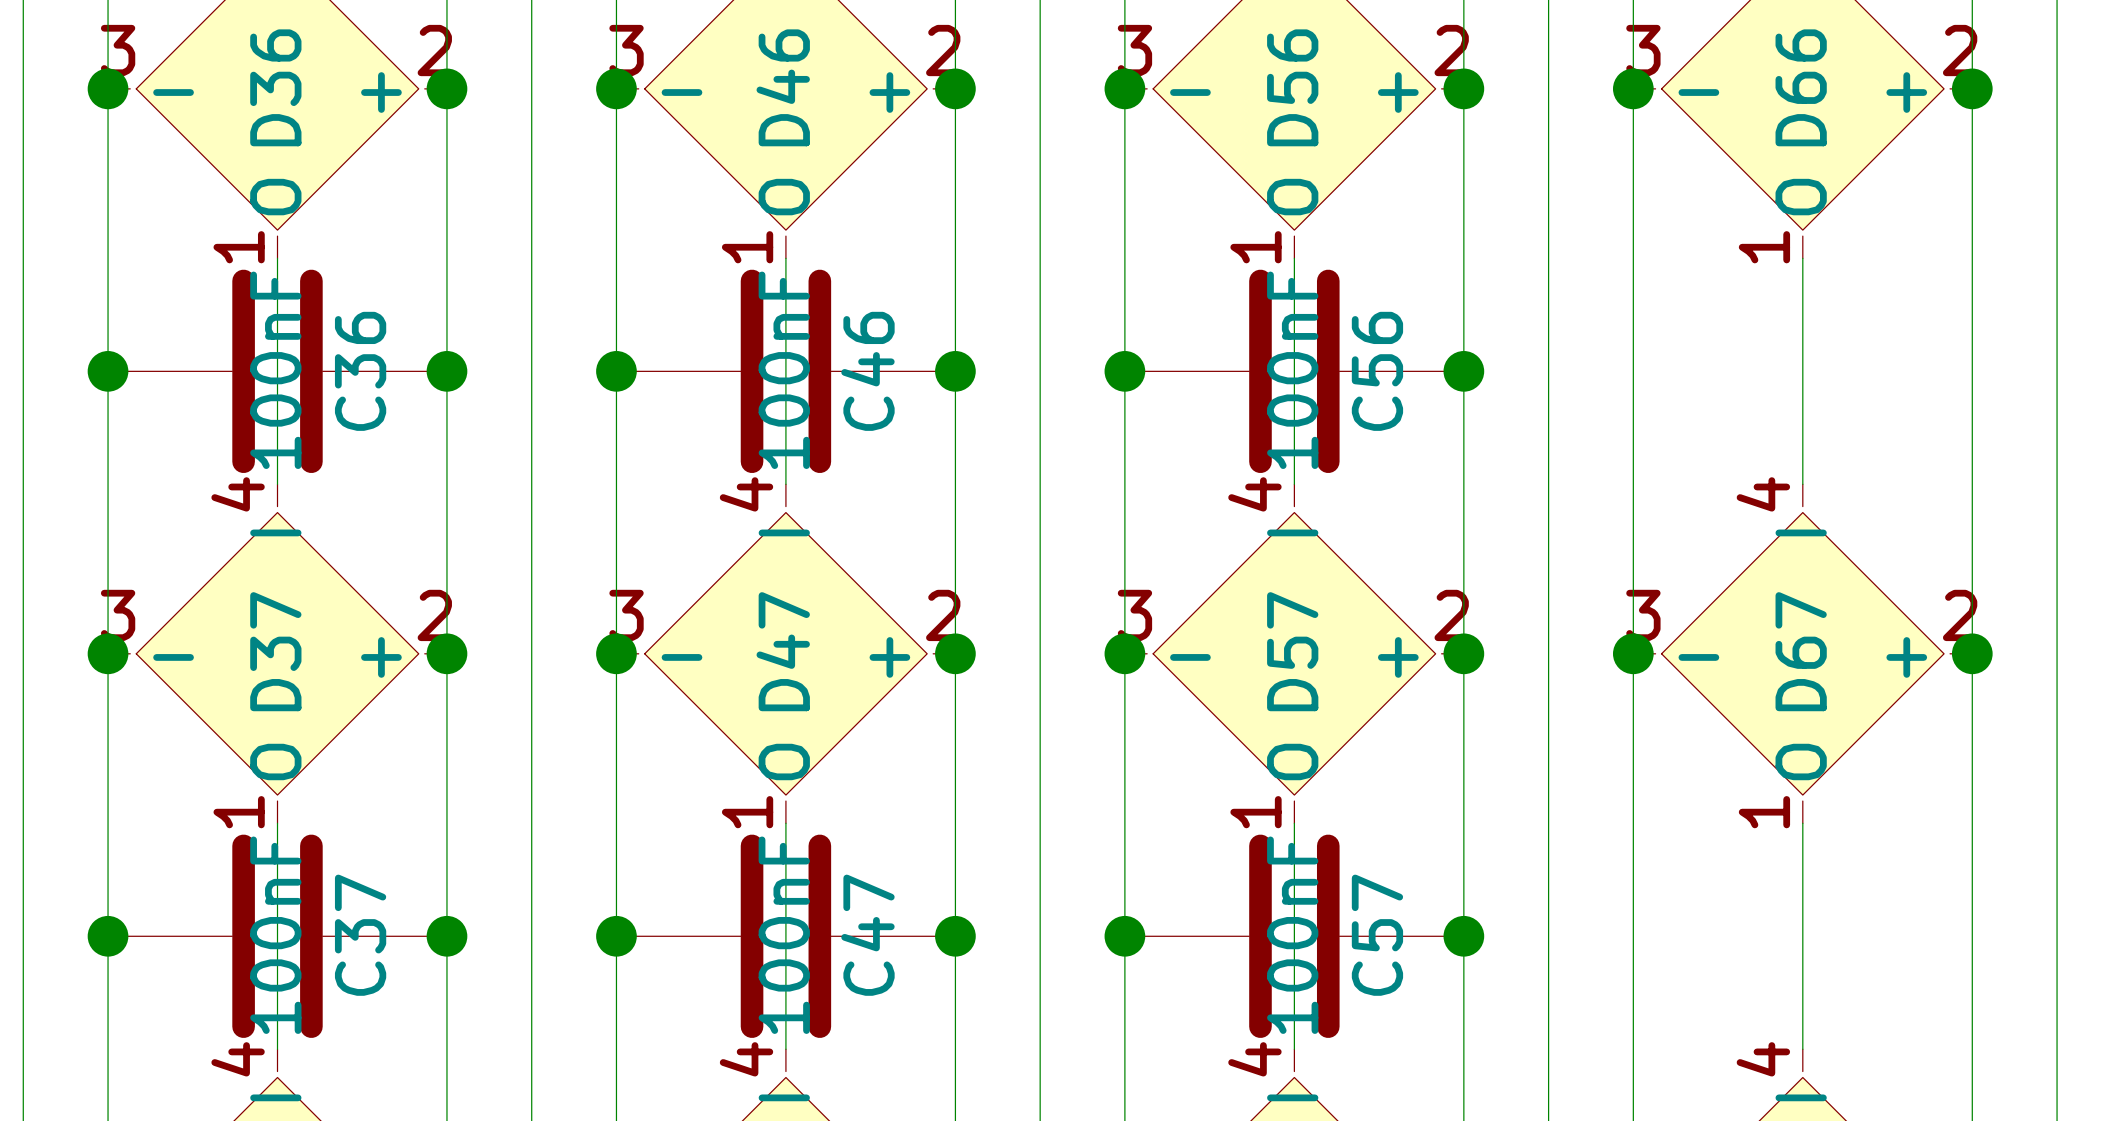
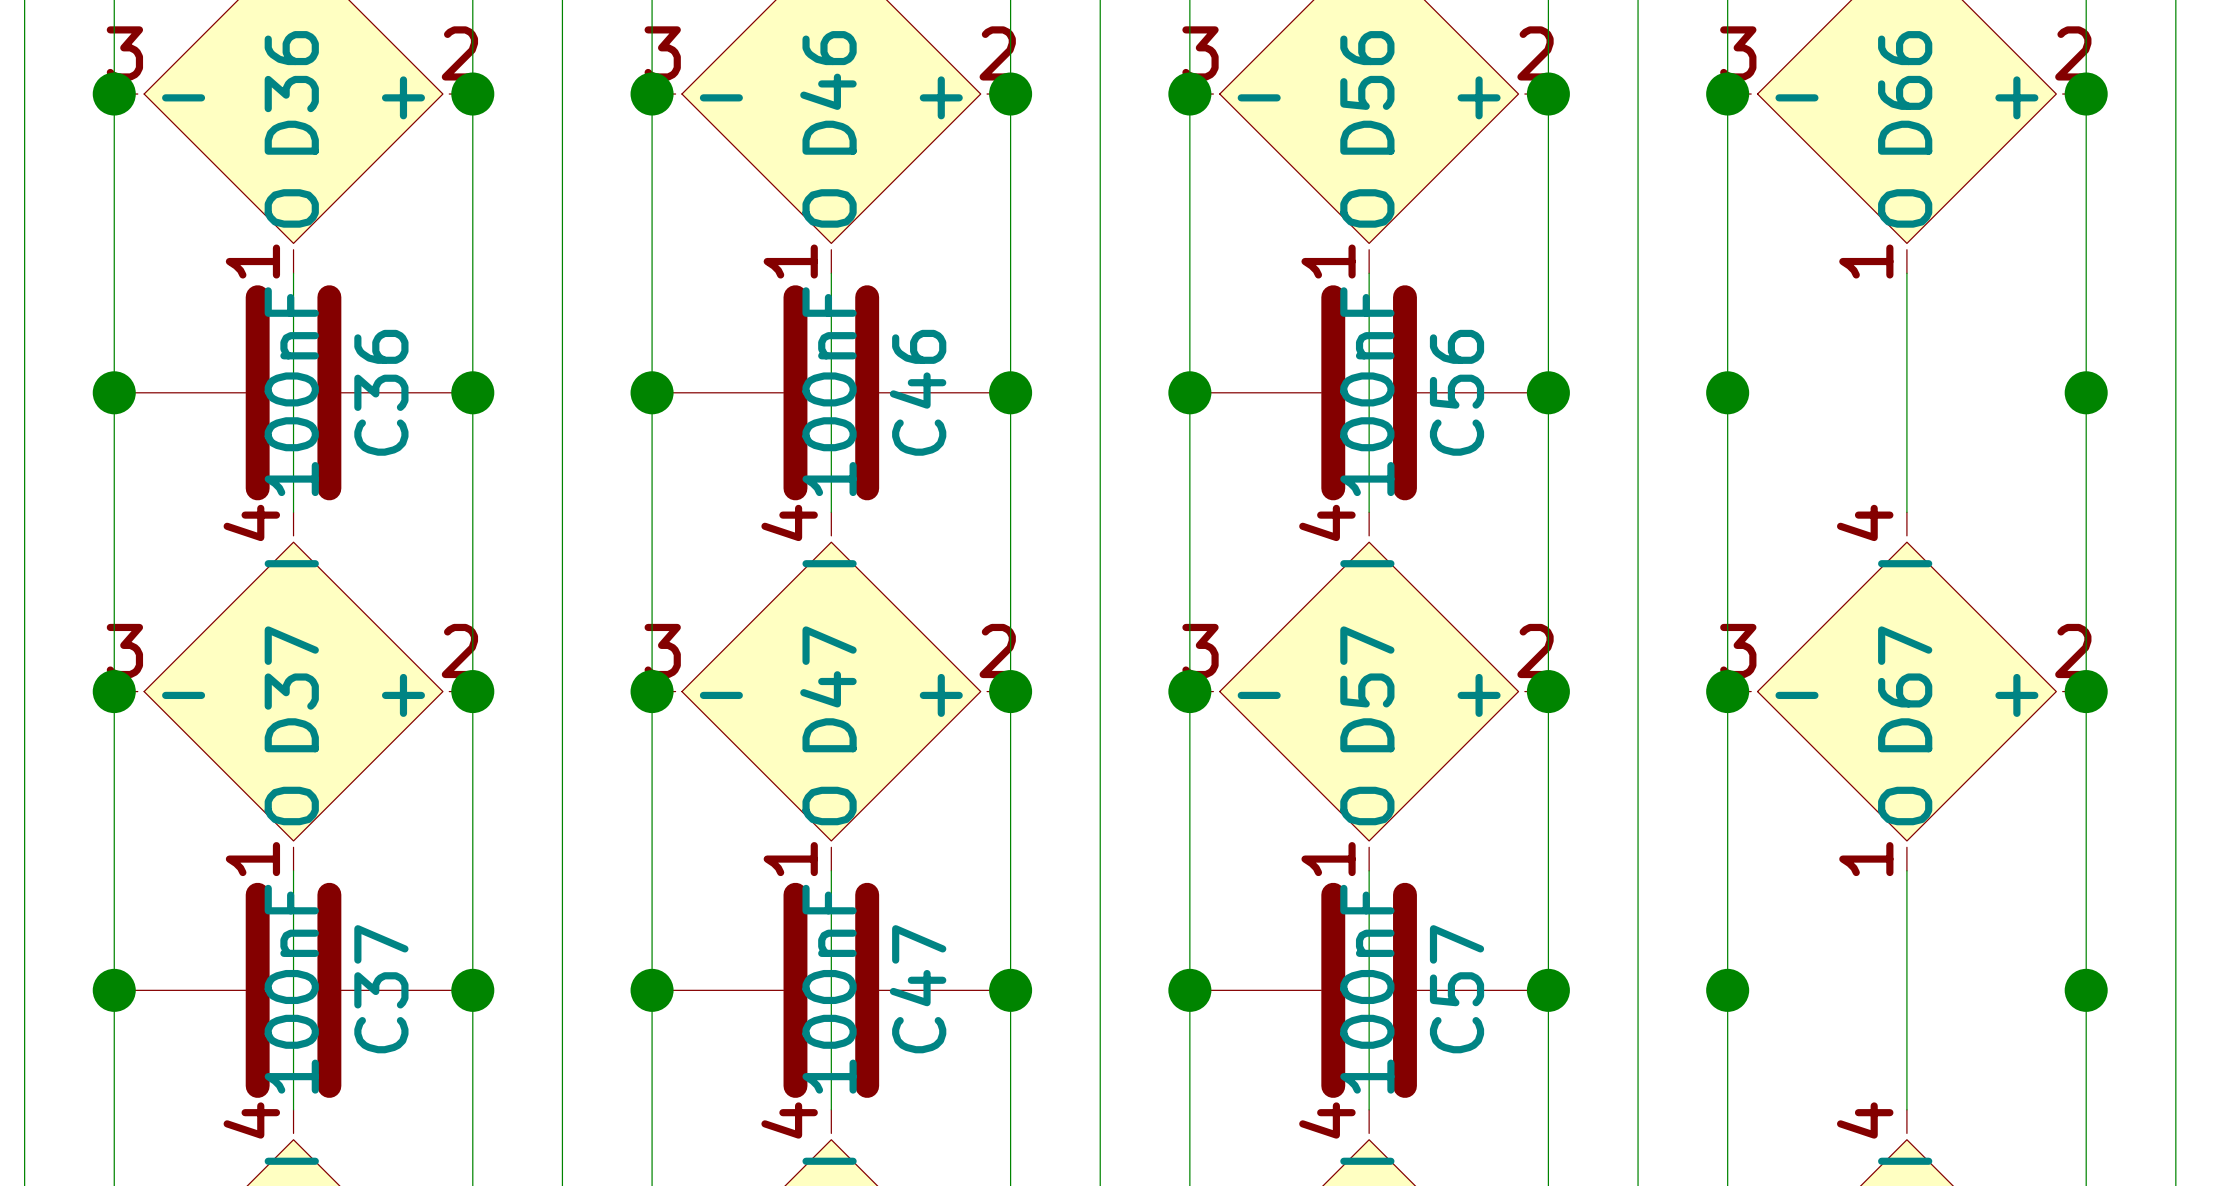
junction: none -> (1727, 392)
junction: none -> (2086, 392)
junction: none -> (1727, 990)
junction: none -> (2086, 990)

